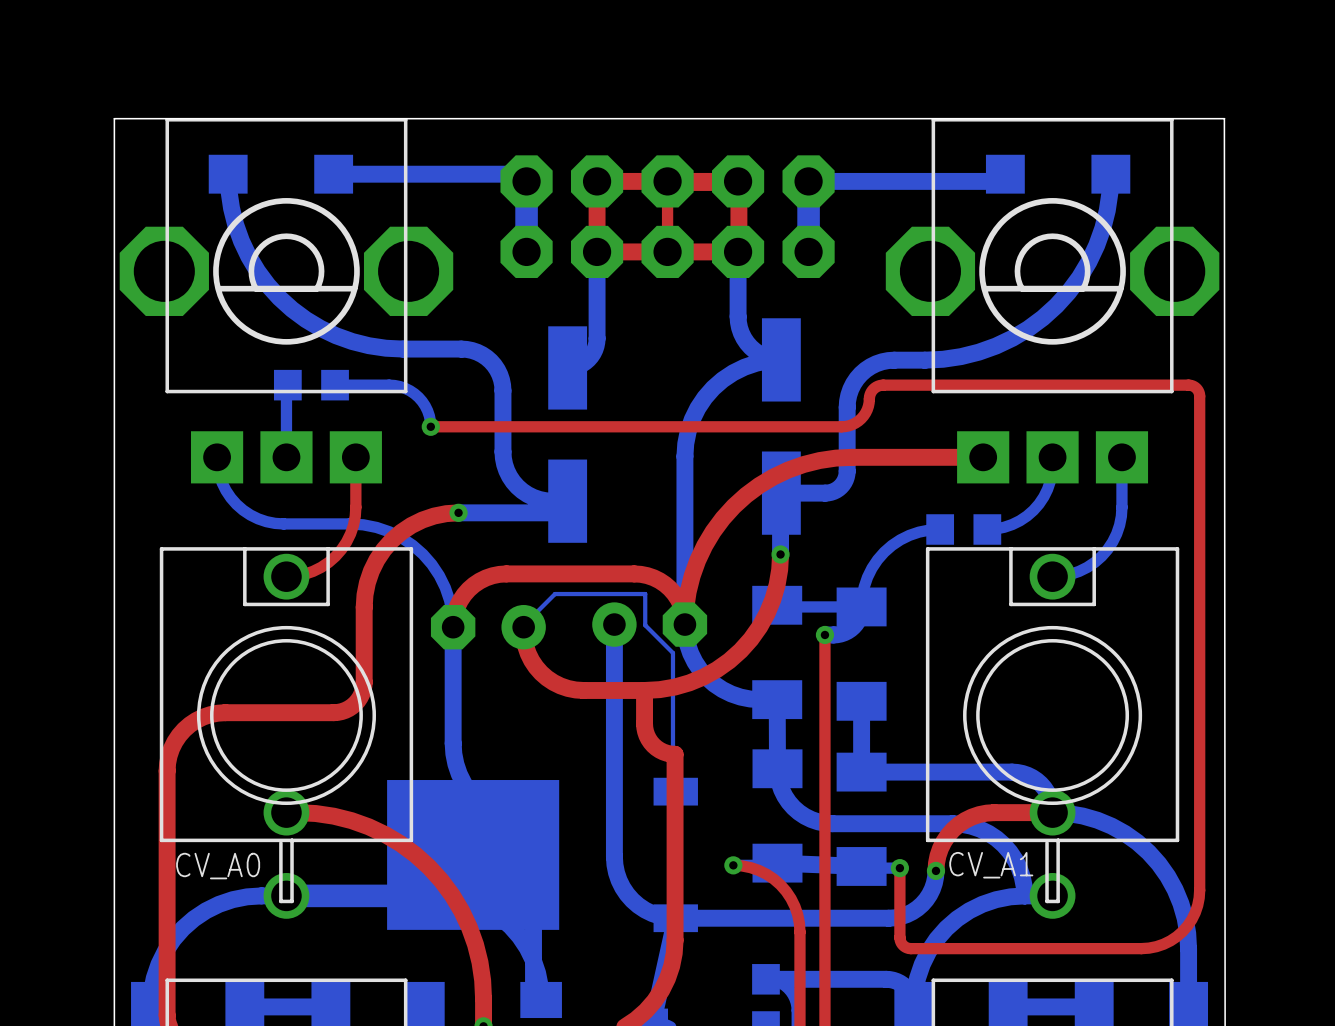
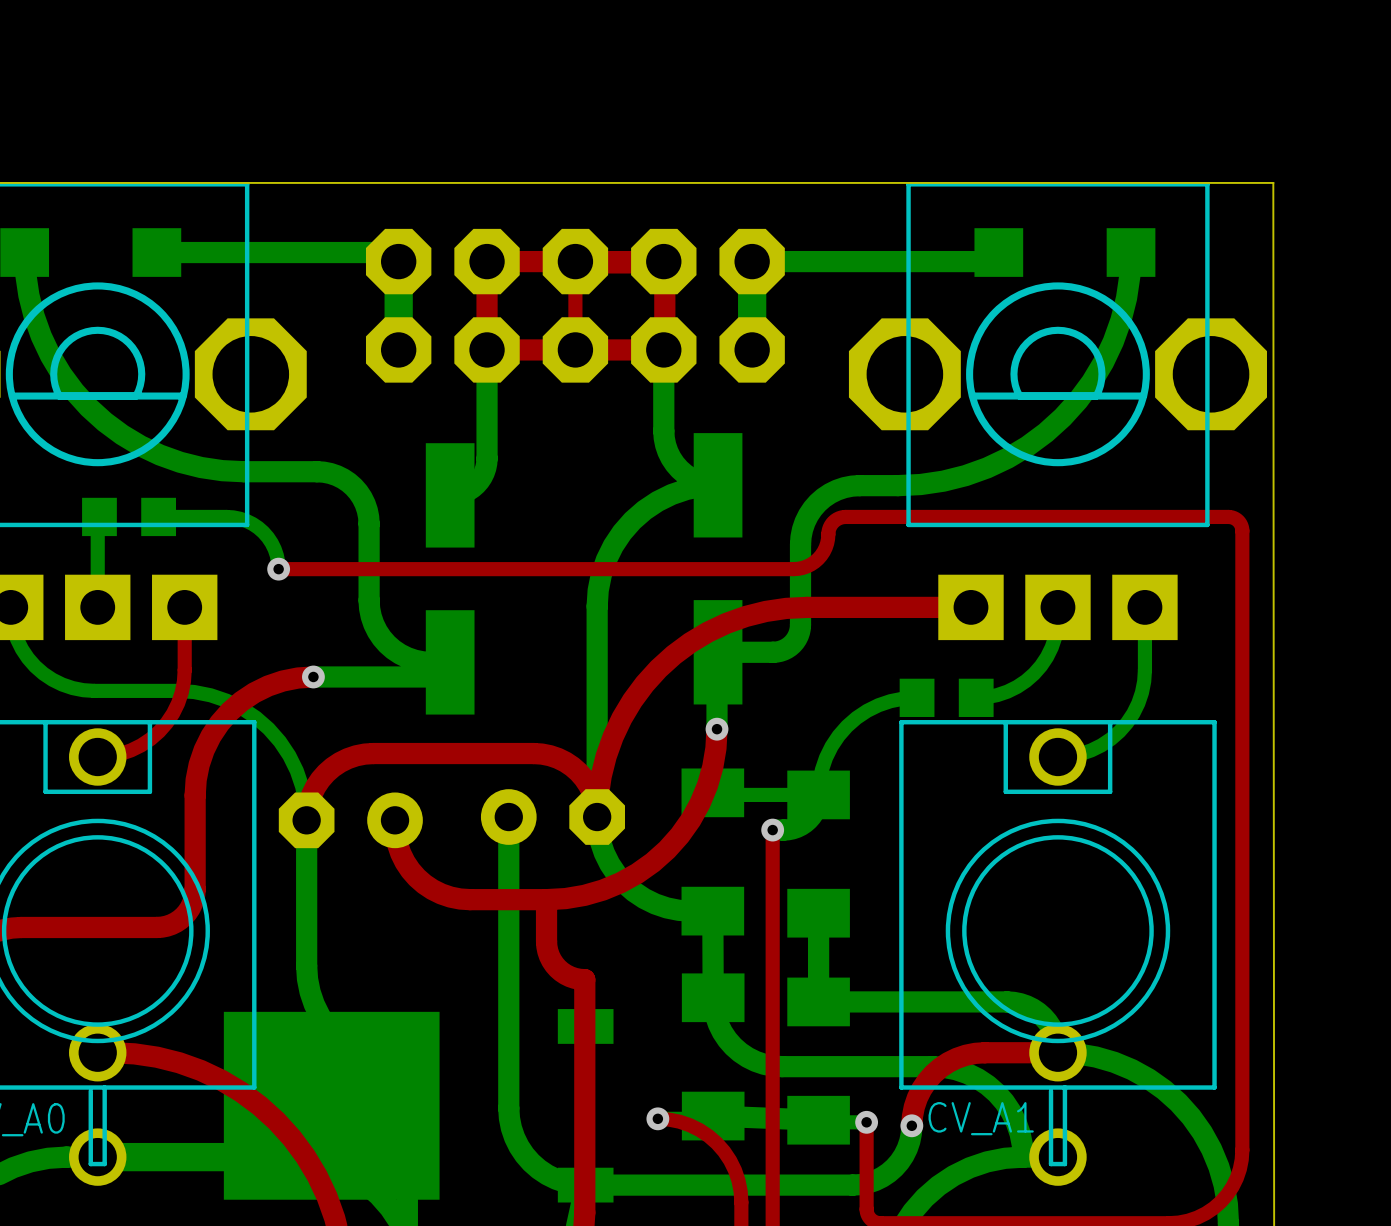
bottom track: (523, 627) (555, 594) (645, 594) (645, 625) (672, 653) (672, 788) (675, 791) -> none

